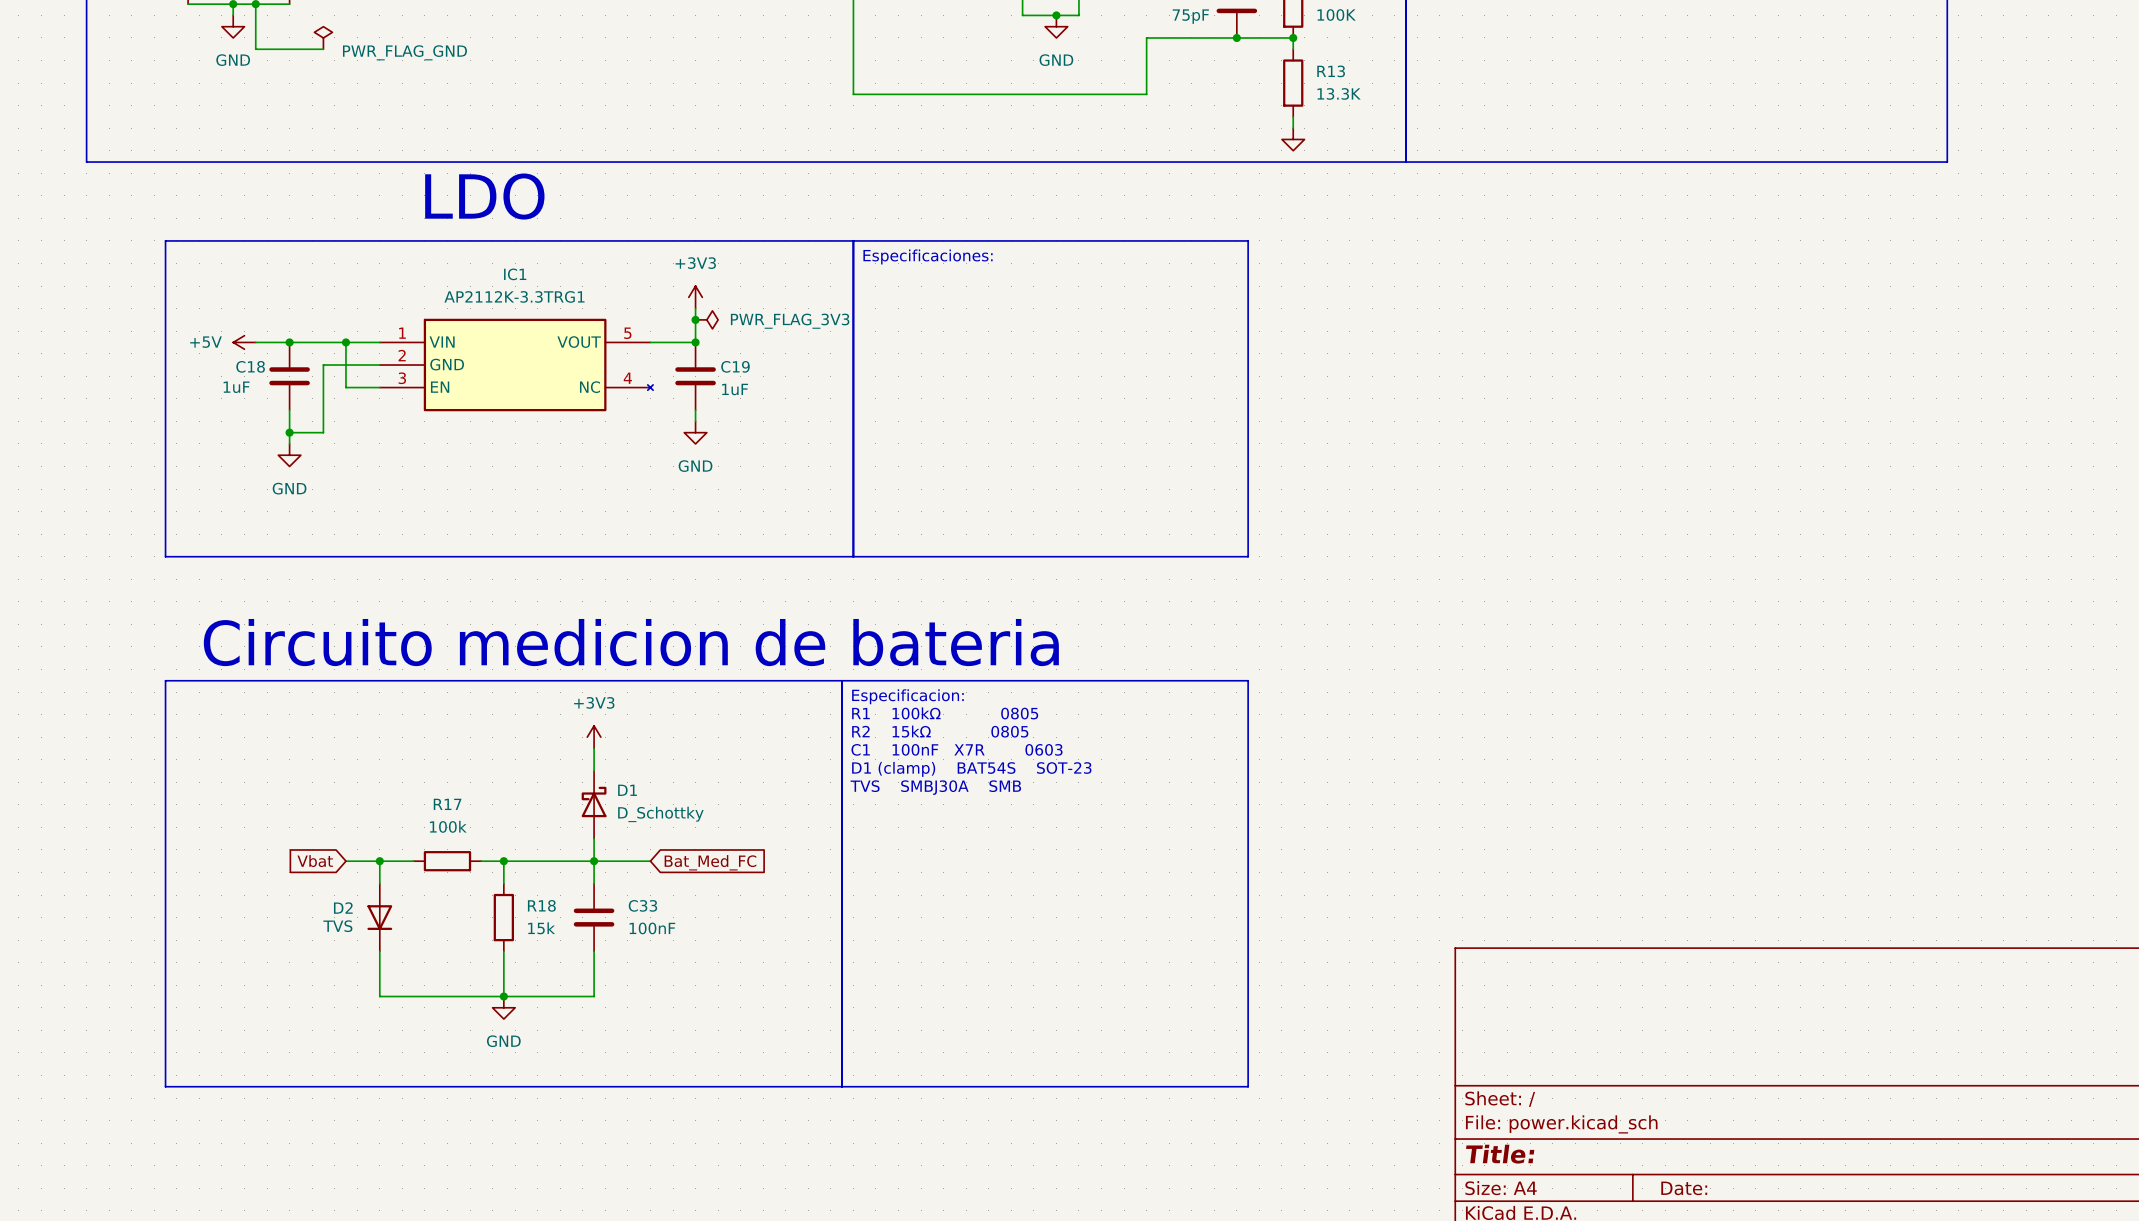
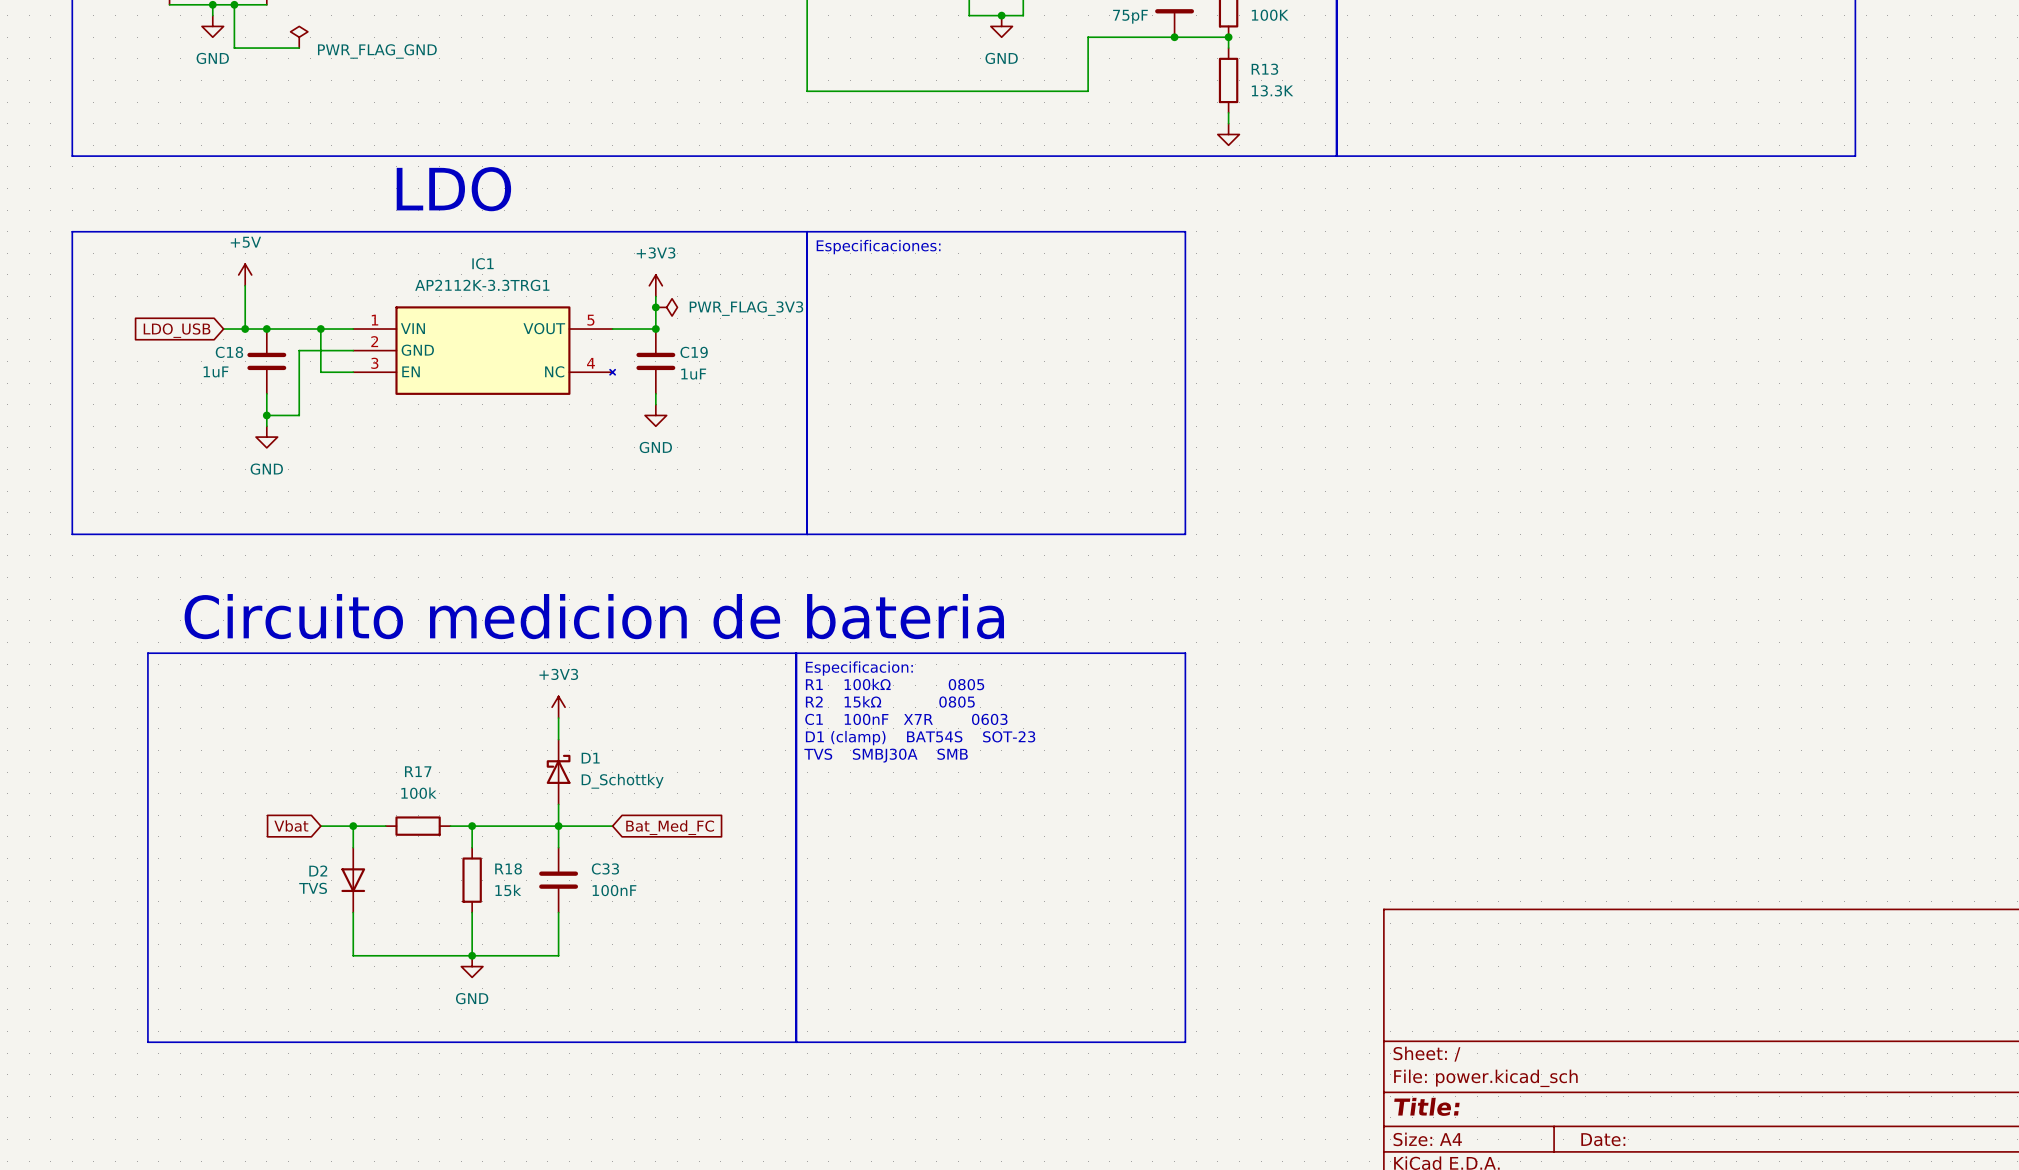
line: (165, 240) (165, 556) -> (147, 231) (72, 231) (72, 534) (147, 534)
wire: none -> (245, 285) (245, 329)
power symbol rotation: 0° (244, 342) -> 90° clockwise (245, 274)
power symbol position: +5V (244, 342) -> +5V (245, 274)
junction: none -> (245, 329)
global label: none -> LDO_USB (177, 330)

